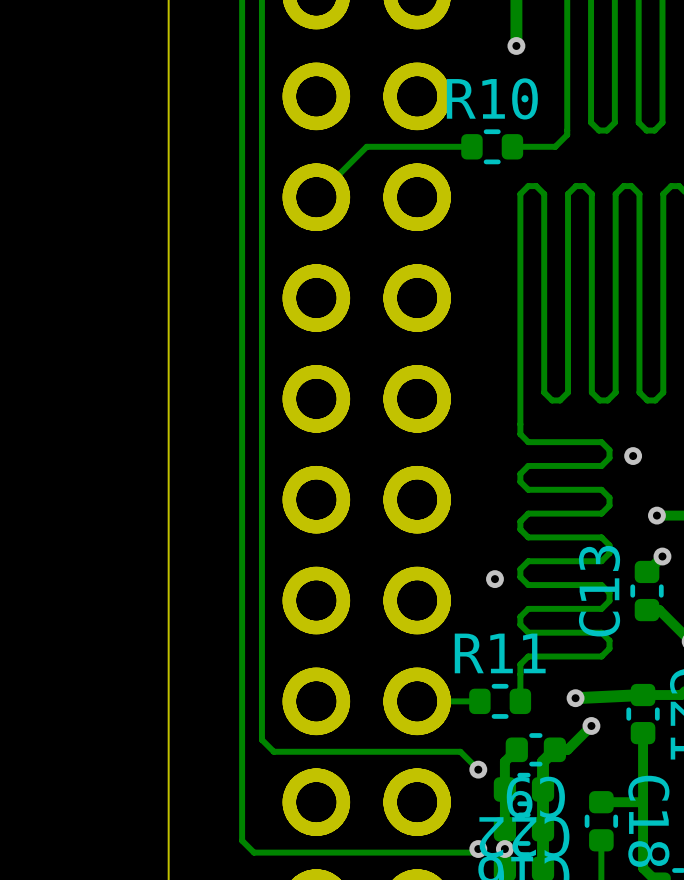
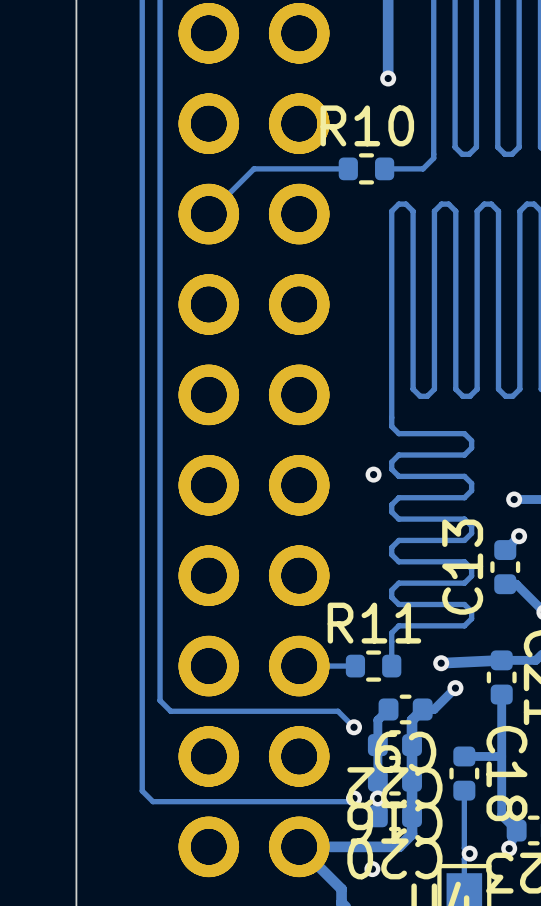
via: (633, 456) -> none
via: none -> (373, 474)
via: (494, 579) -> none

